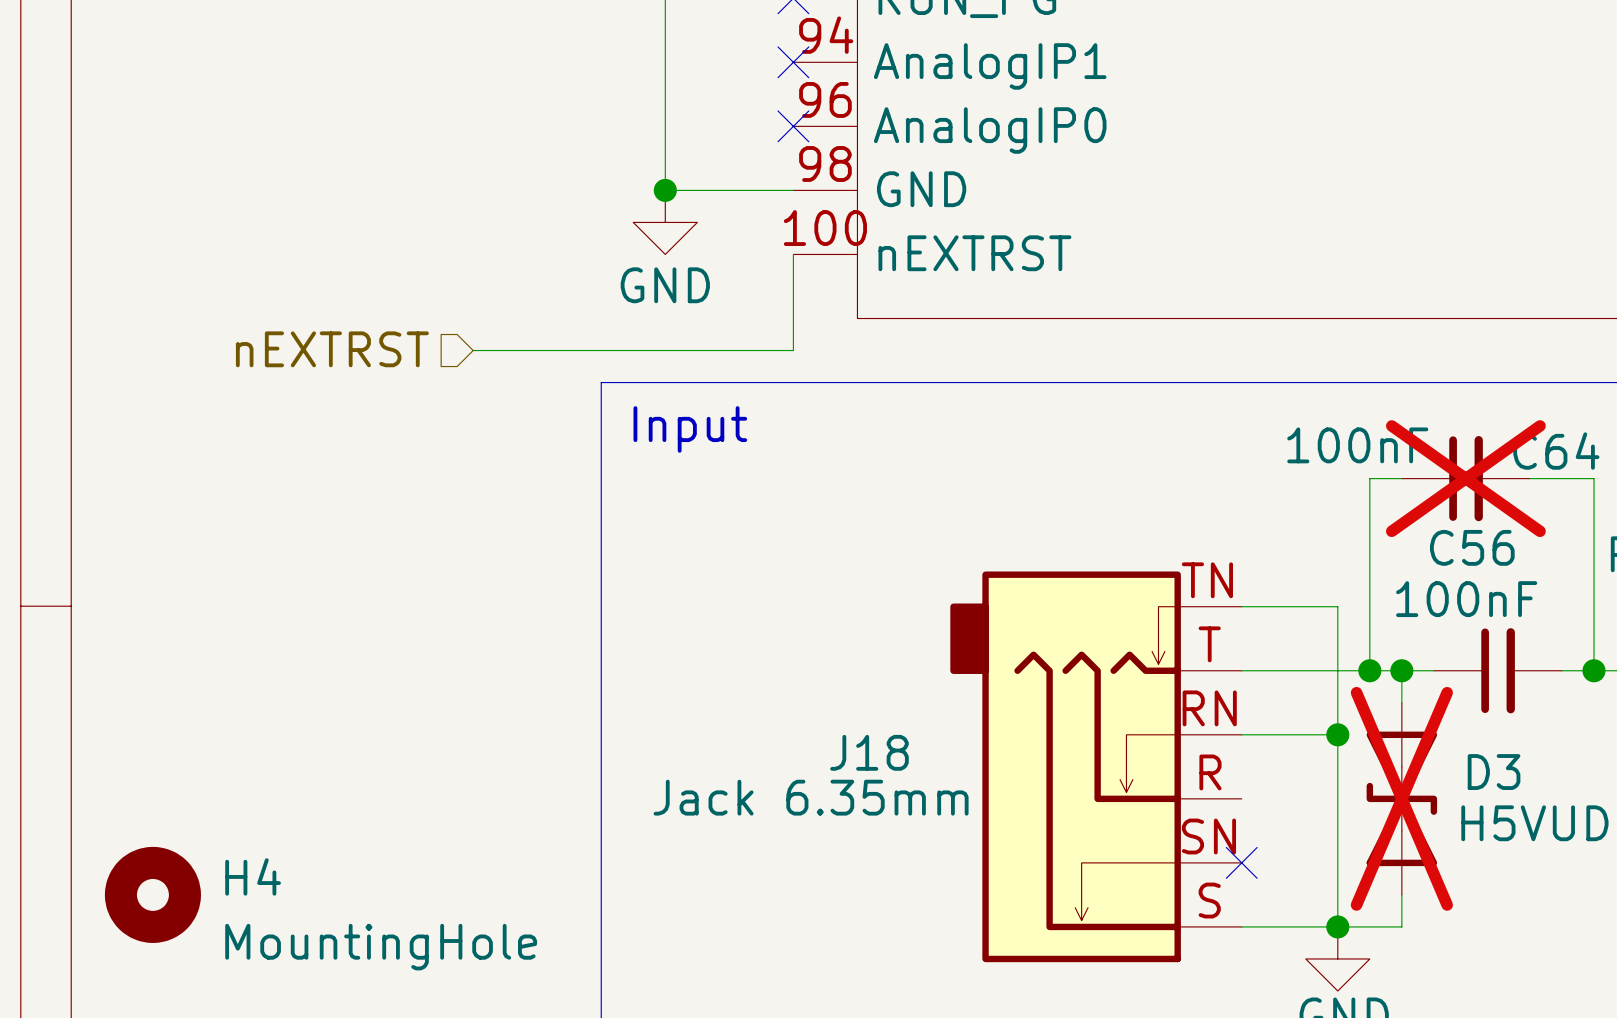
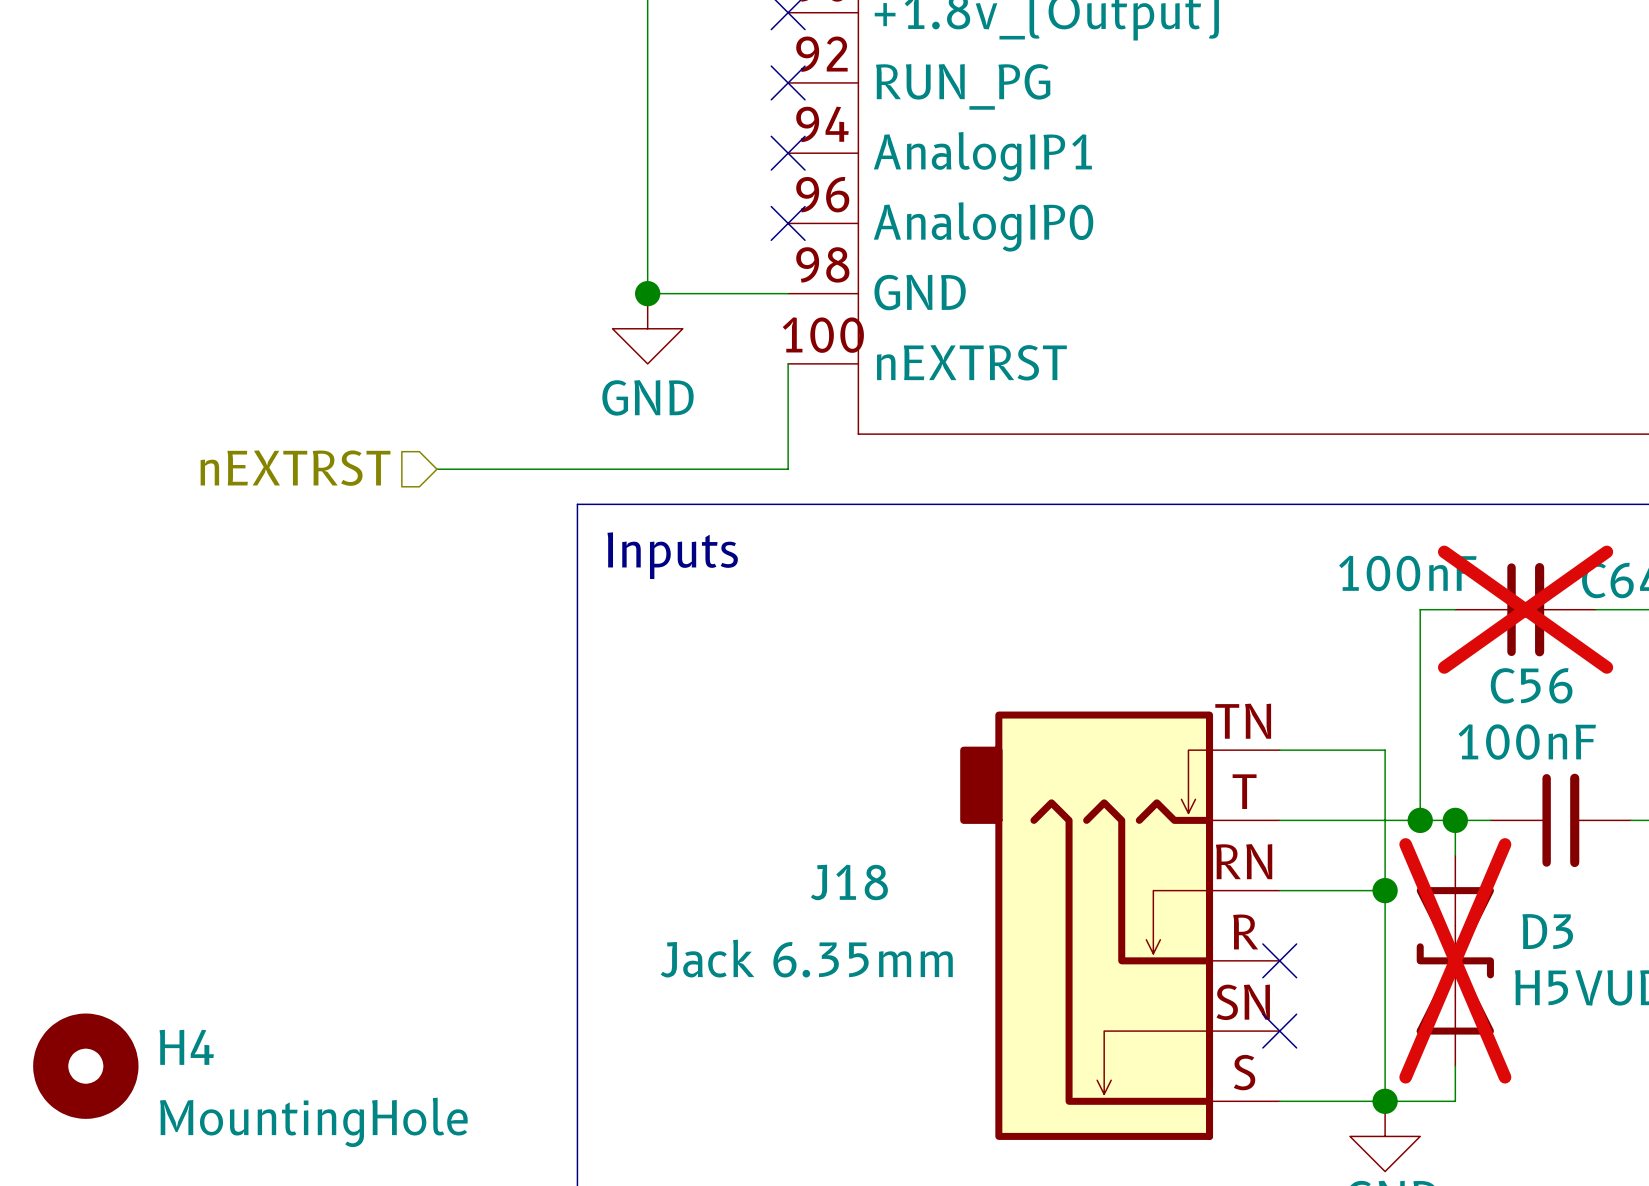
text: Input (690, 429) -> Inputs (672, 555)
J18 name position: J18 (869, 752) -> J18 (849, 882)
no-connect mark: none -> (1279, 960)

